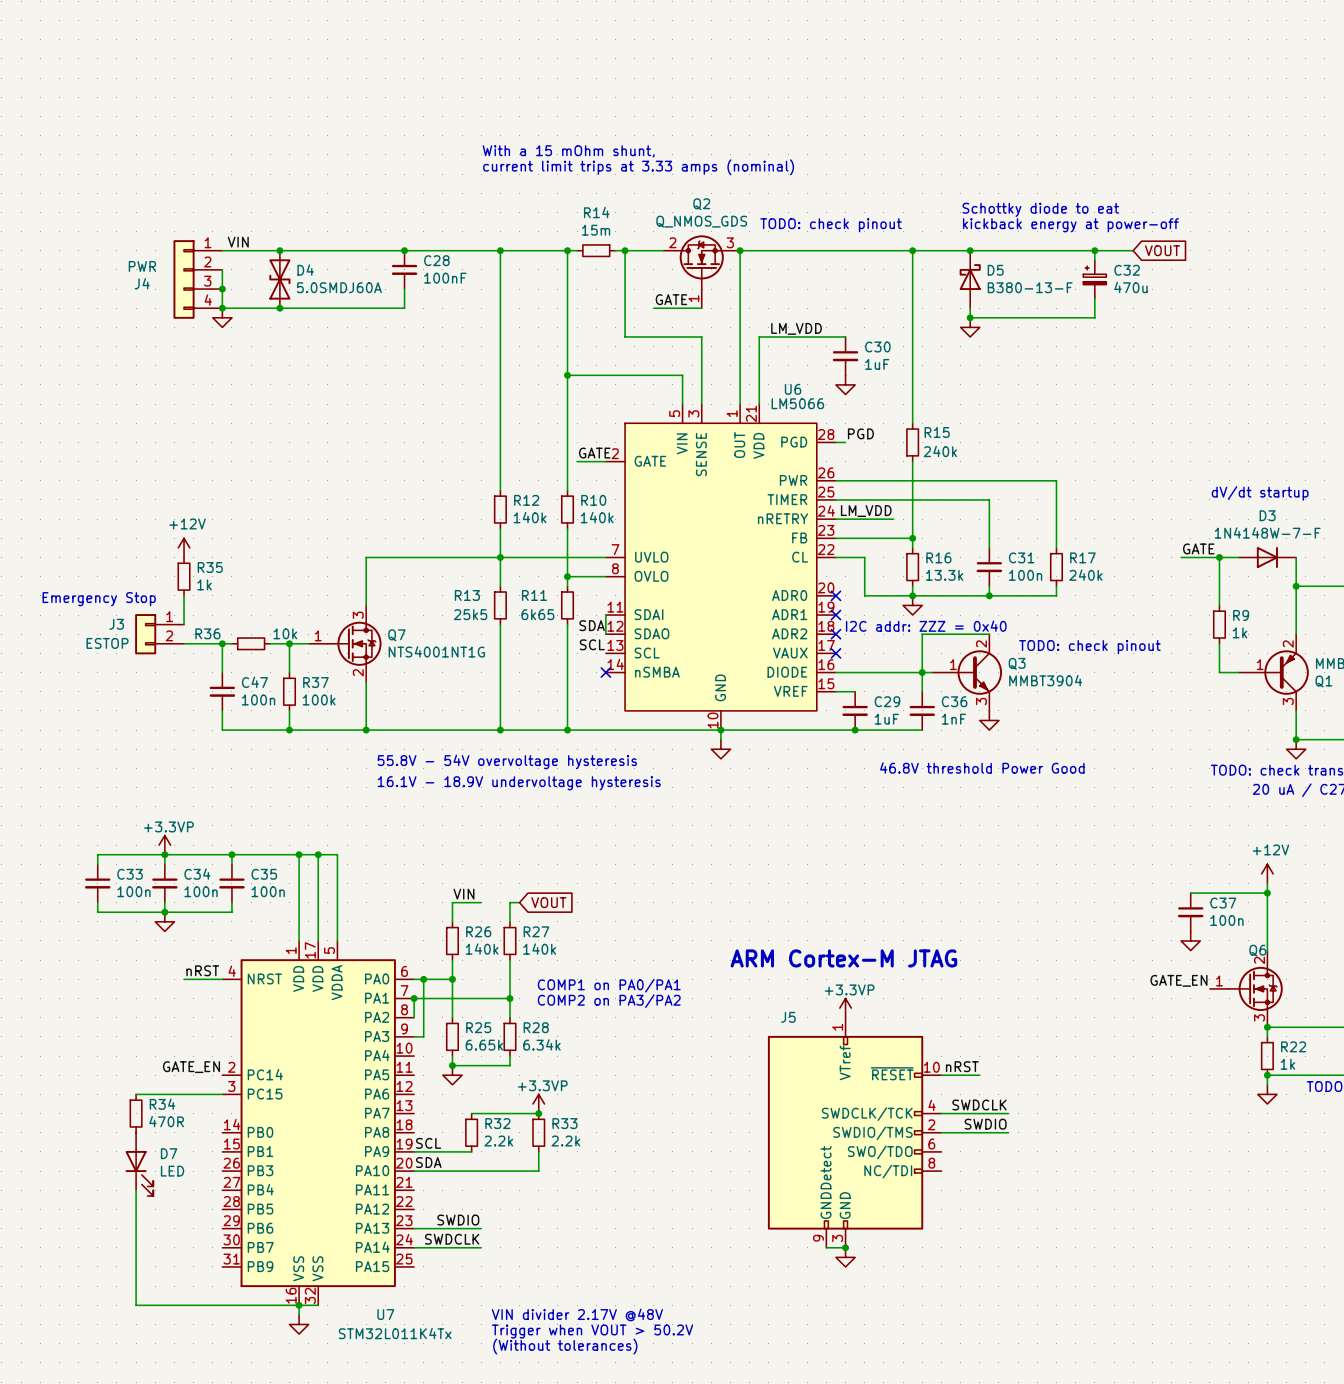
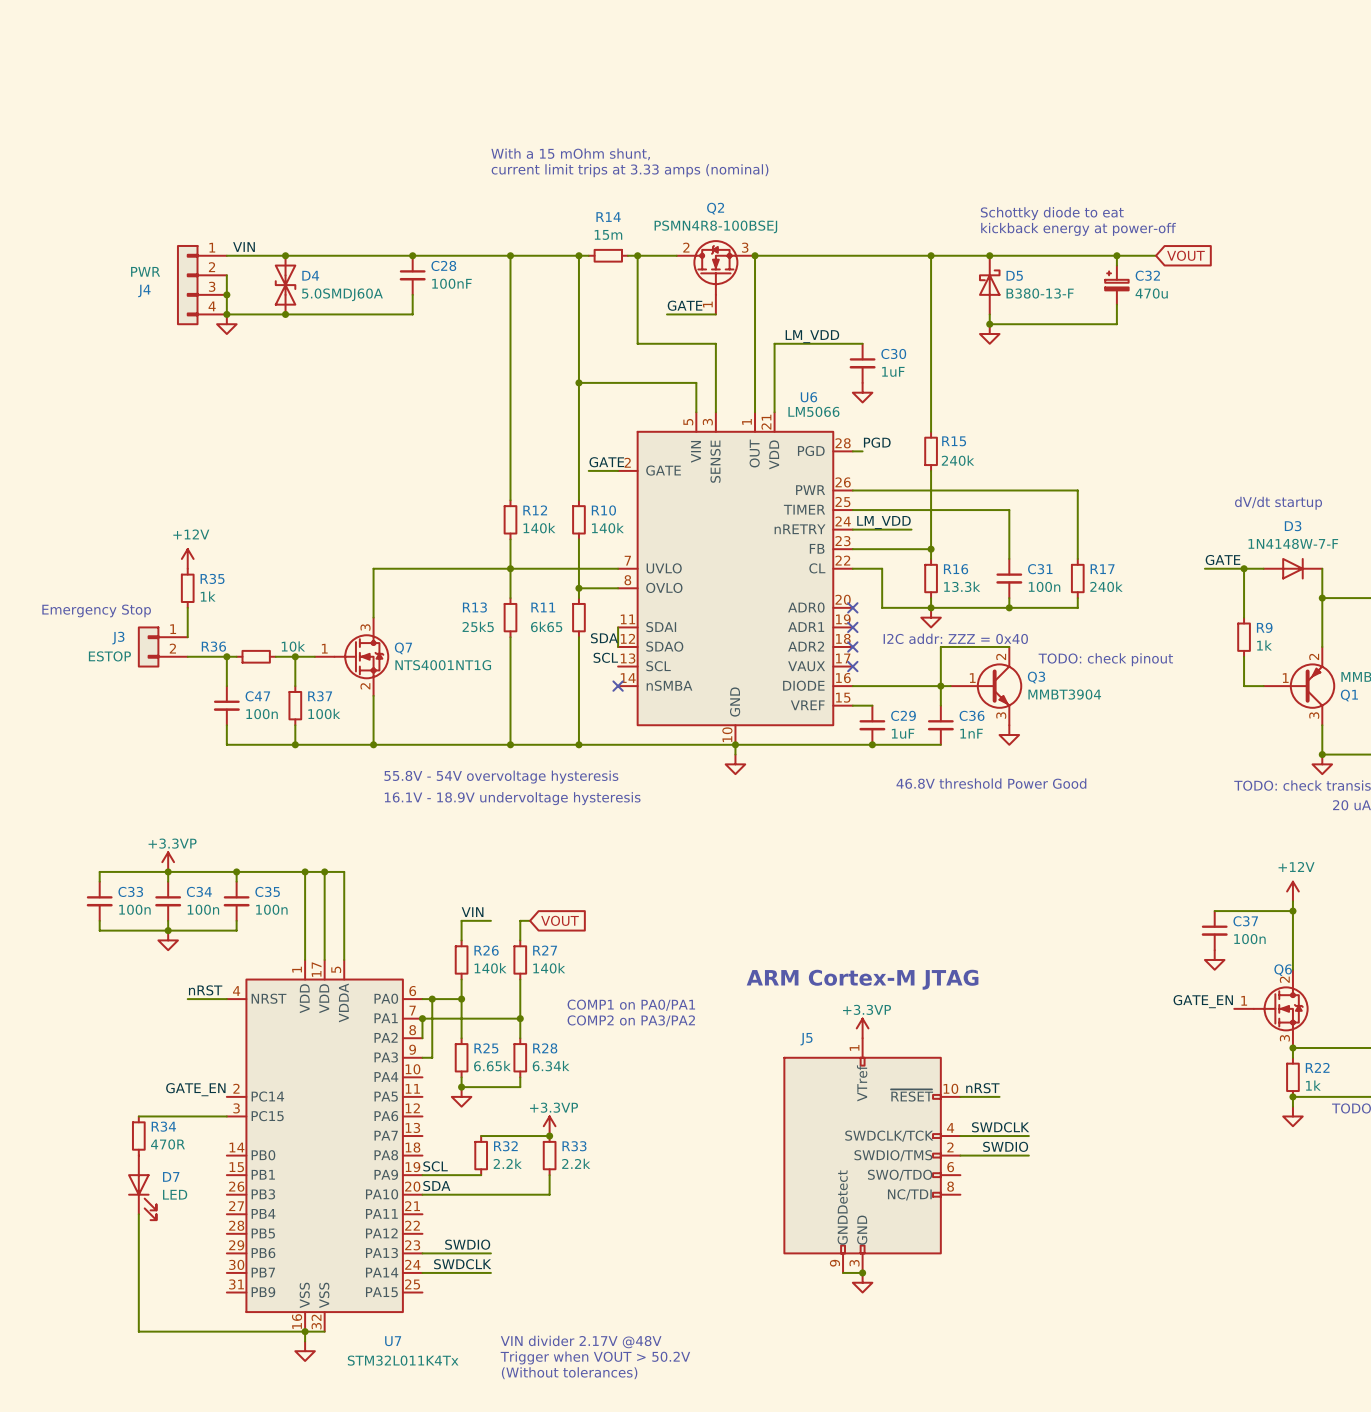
Q2 value: Q_NMOS_GDS (701, 221) -> PSMN4R8-100BSEJ (715, 226)
text: TODO: check pinout (831, 225) -> none

